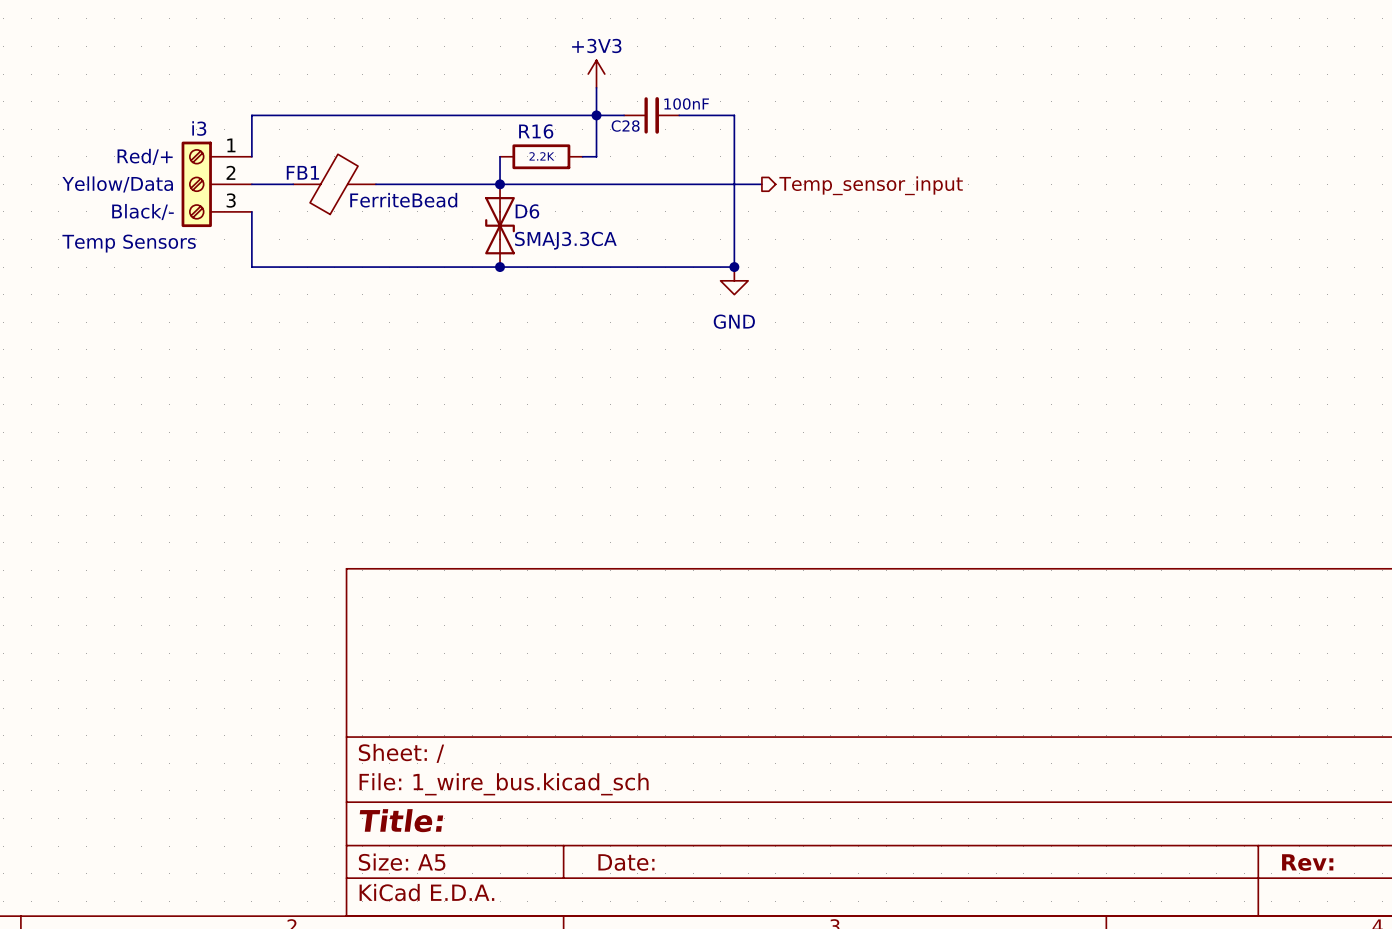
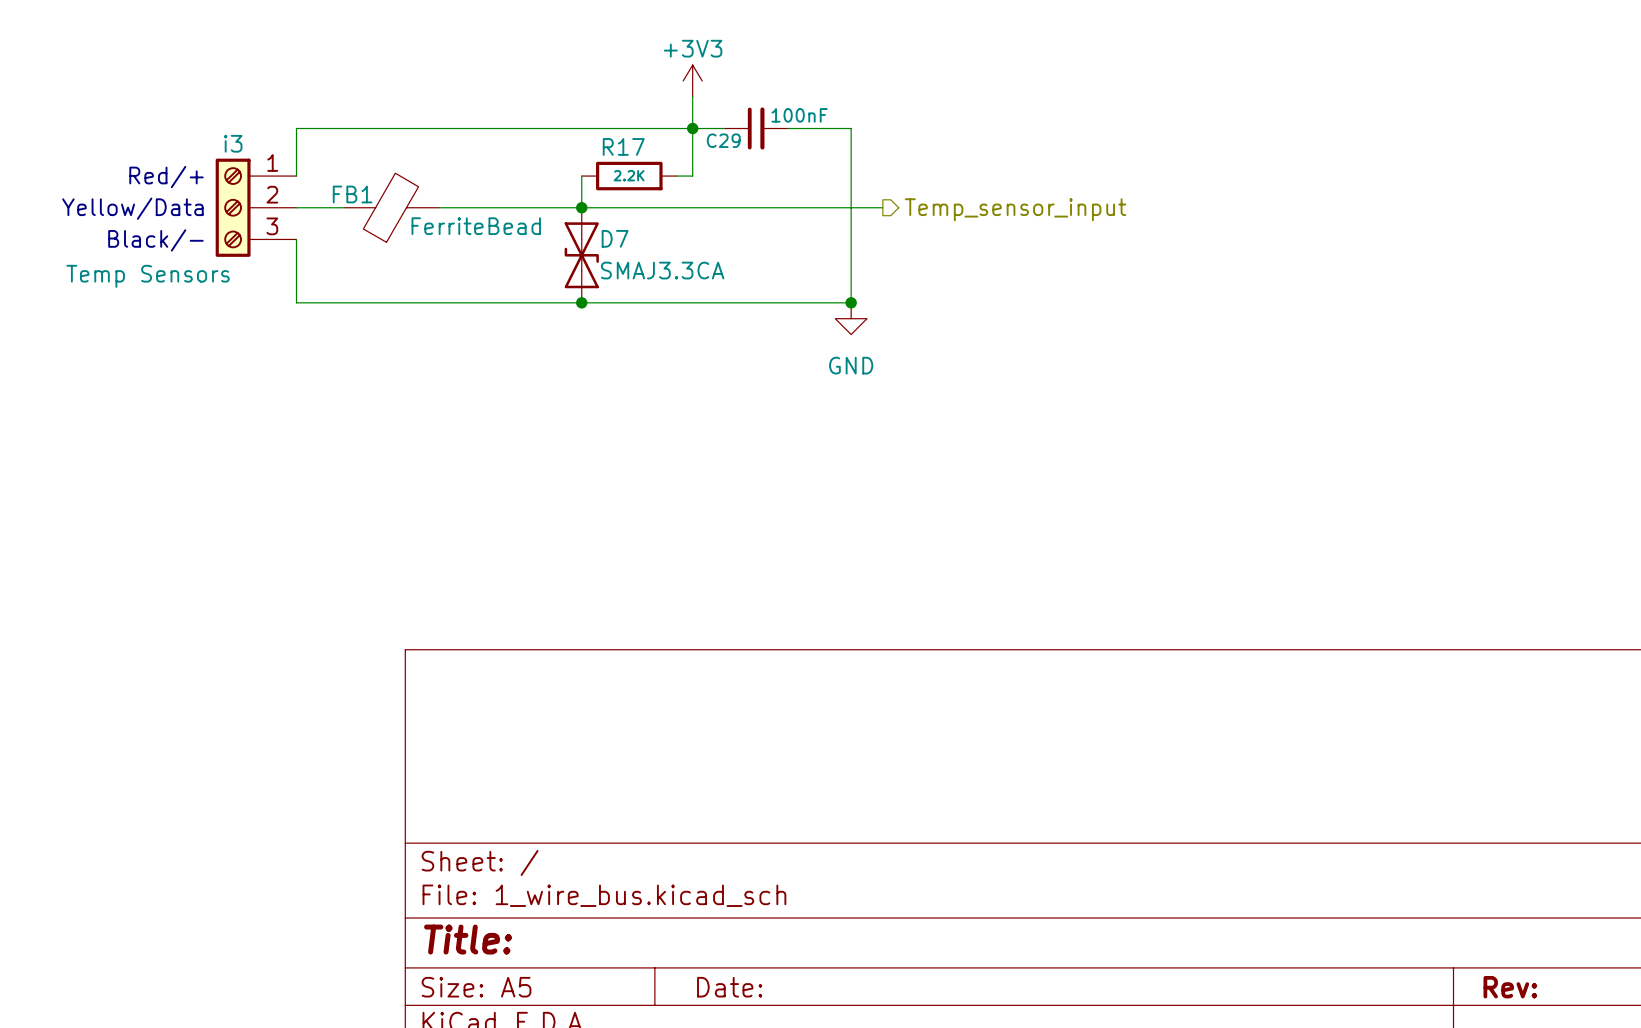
C28 name: C28 (625, 126) -> C29 (723, 140)
R16 name: R16 (536, 131) -> R17 (623, 146)
D6 name: D6 (527, 211) -> D7 (615, 238)

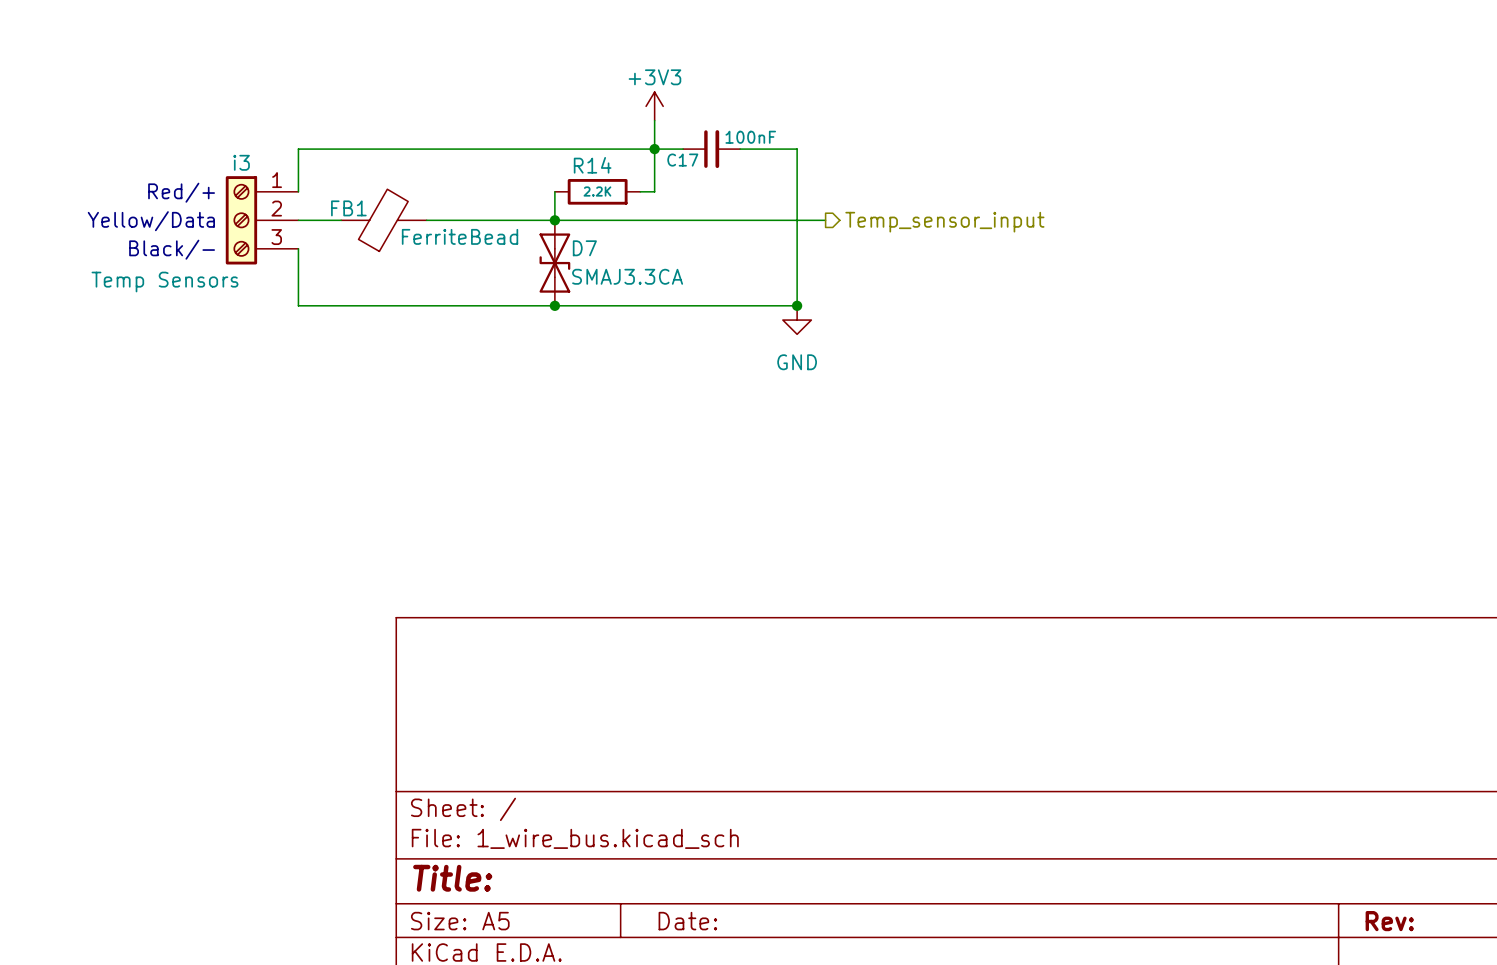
C29 name: C29 (723, 140) -> C17 (682, 160)
R17 name: R17 (623, 146) -> R14 (592, 165)

